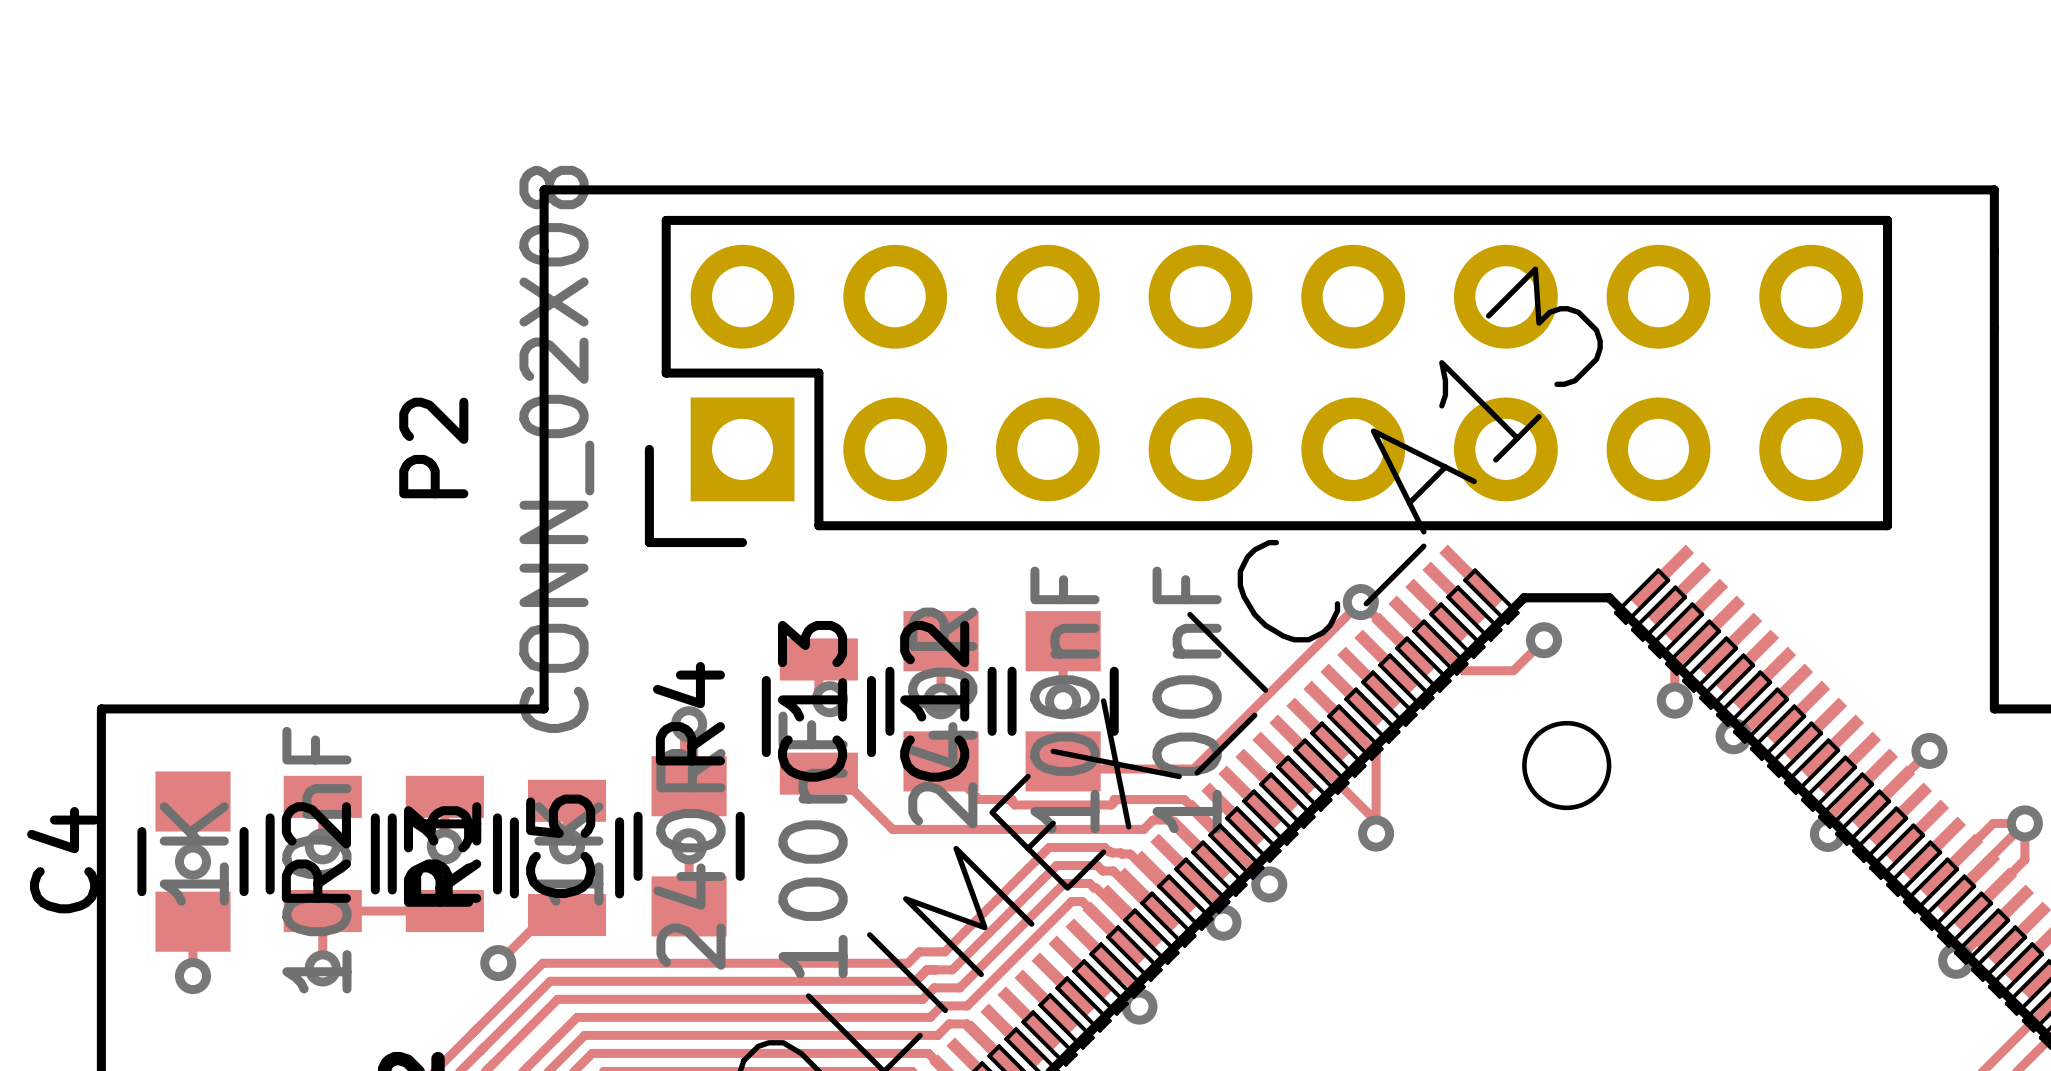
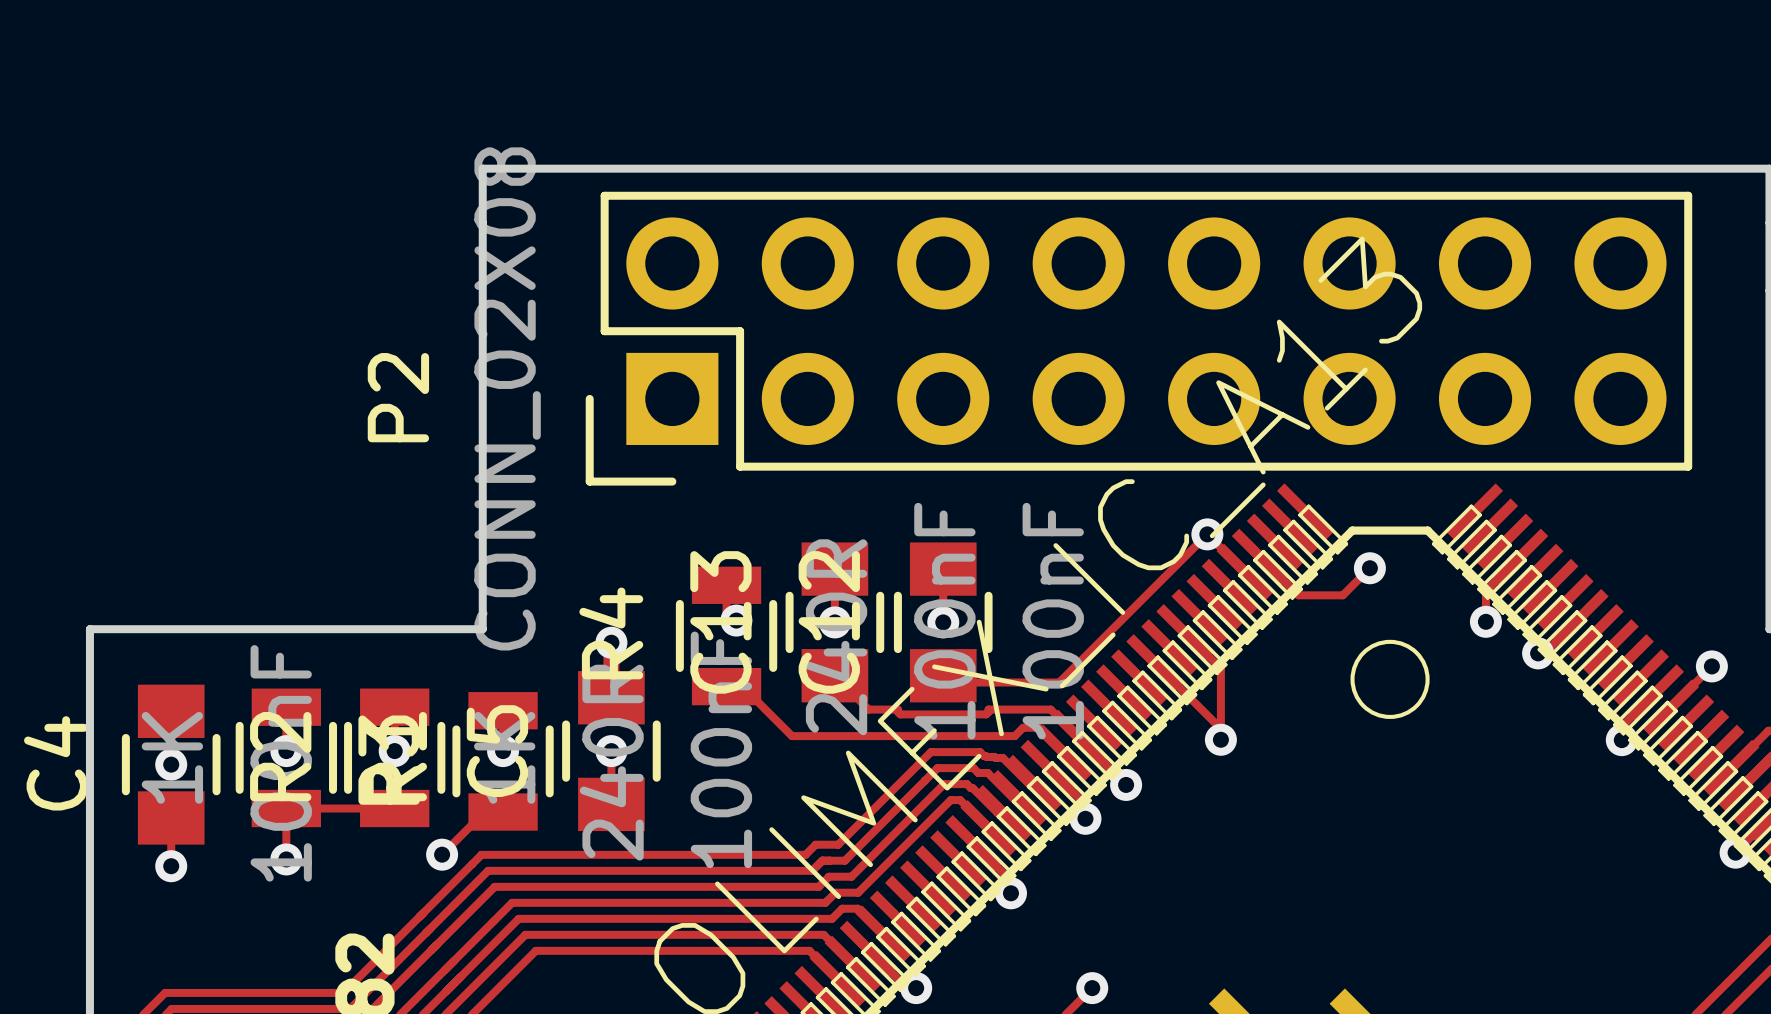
P2 position: (1268, 381) -> (1138, 338)

